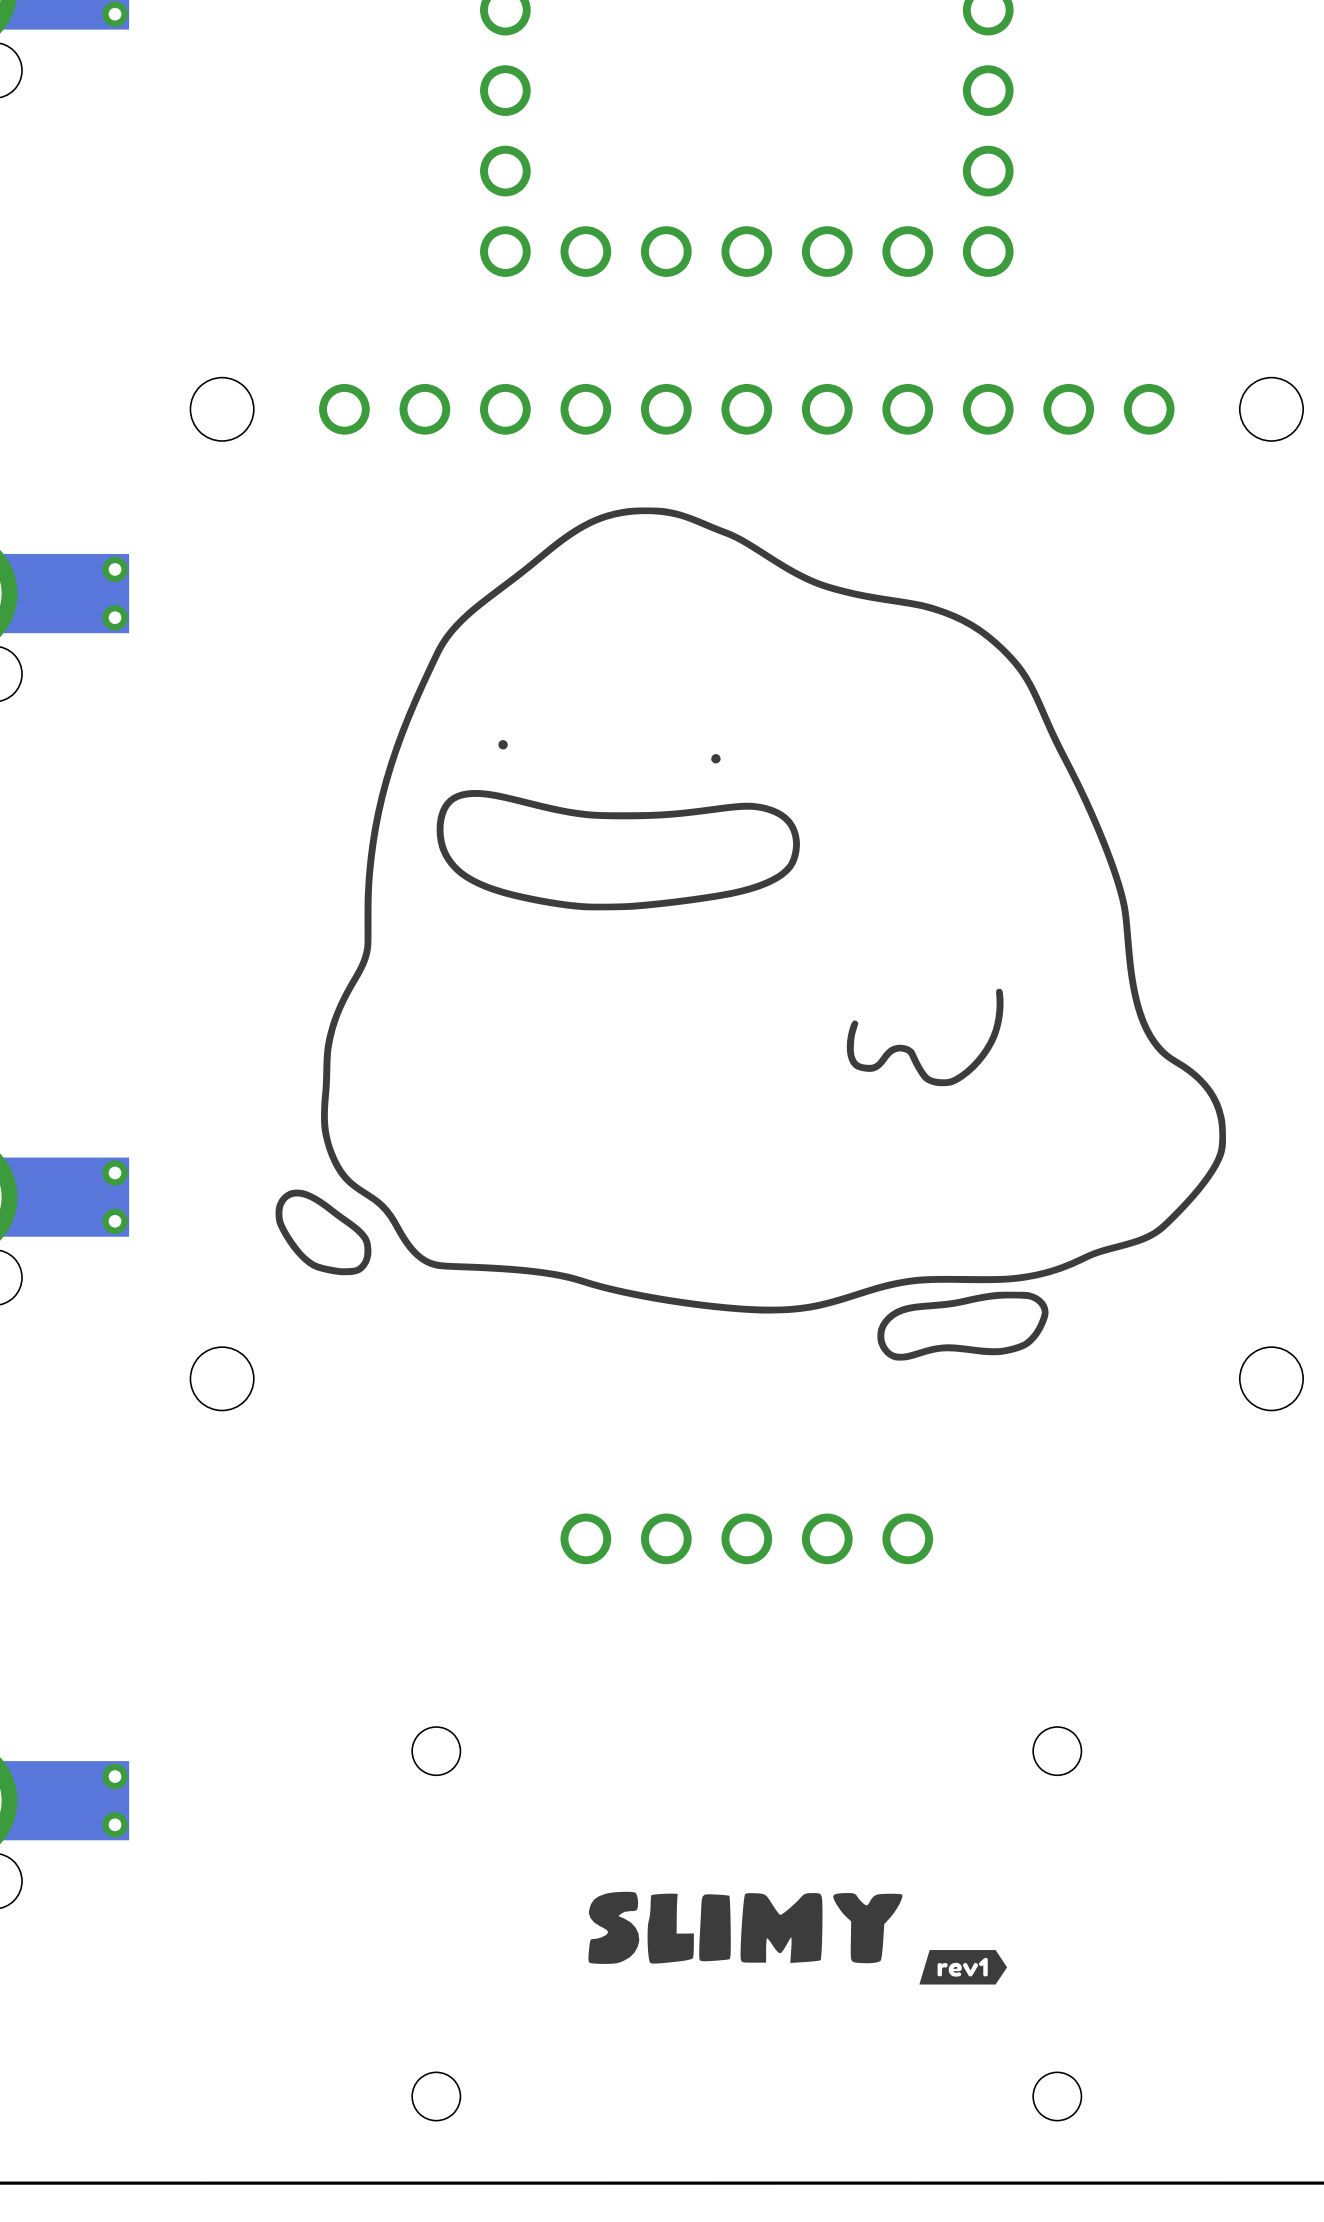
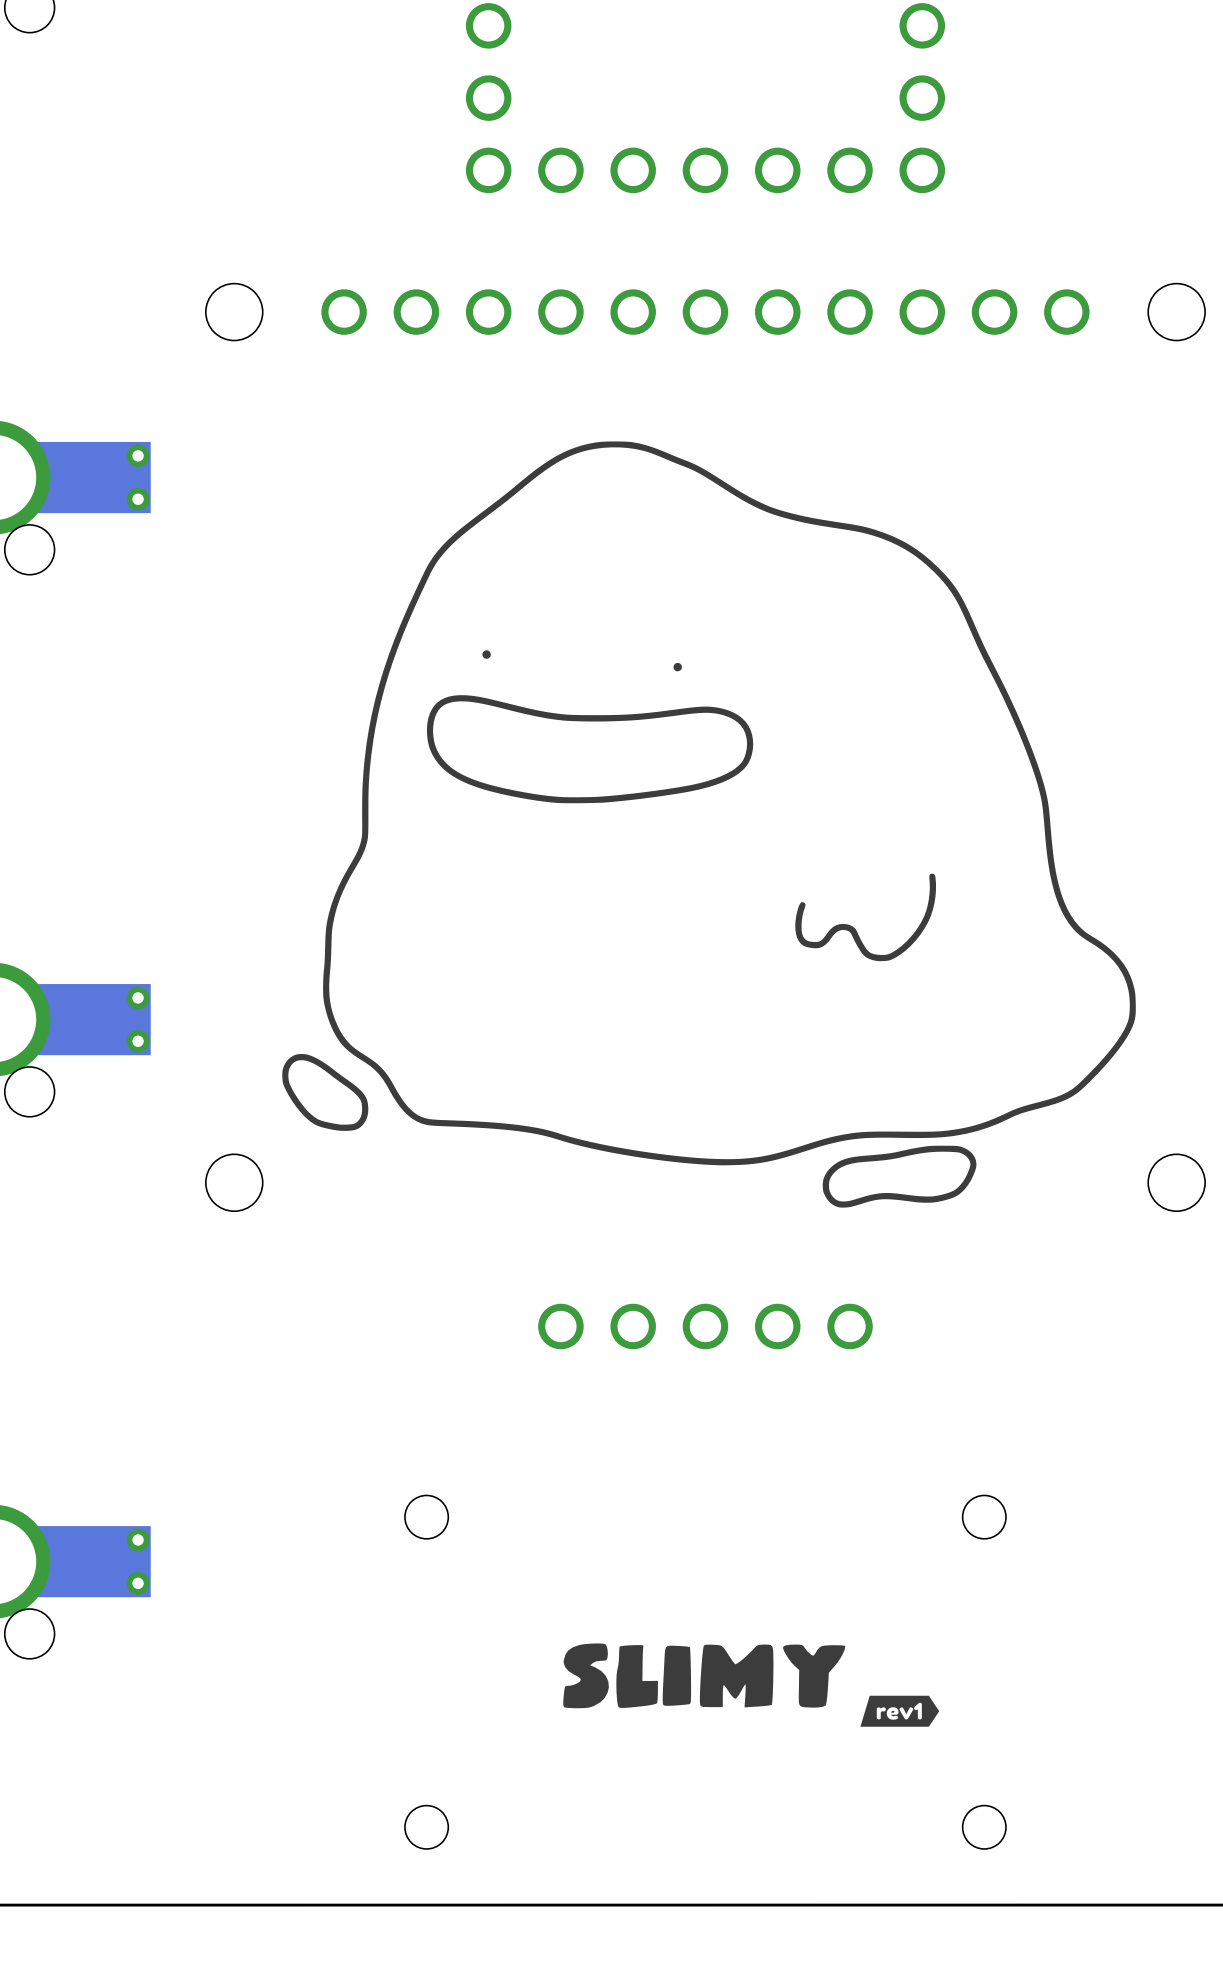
drawing position: (750, 934) -> (709, 824)

